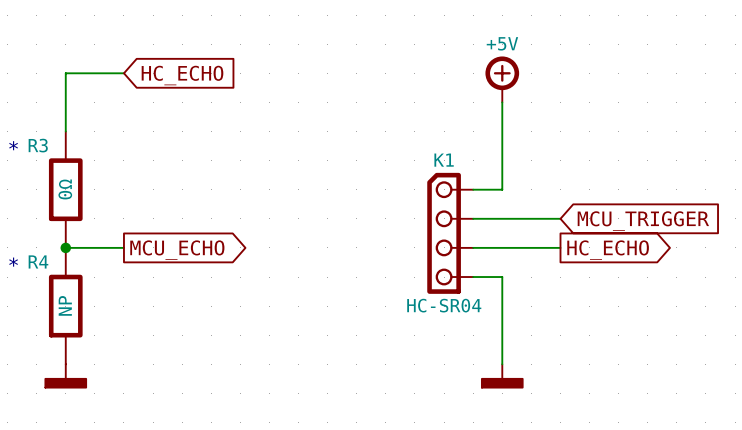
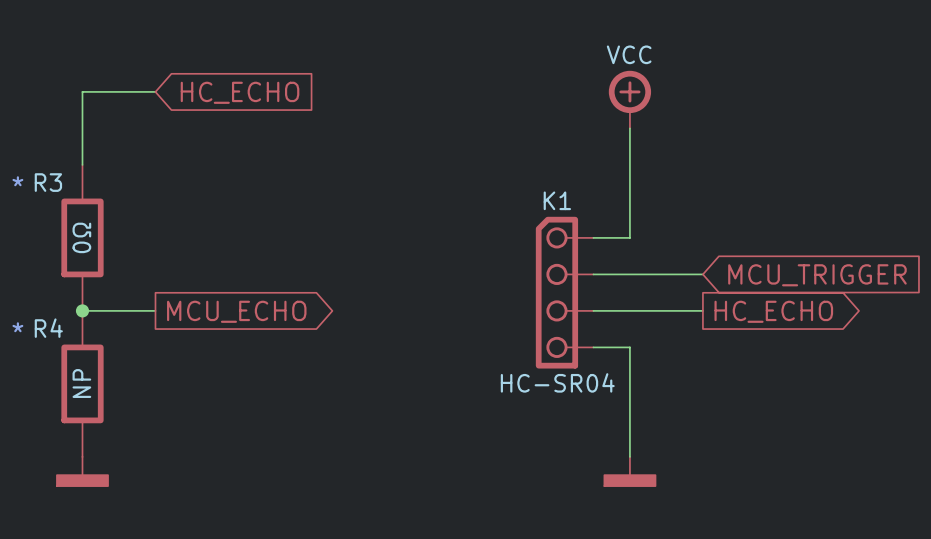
power symbol text: +5V (502, 43) -> VCC (629, 54)

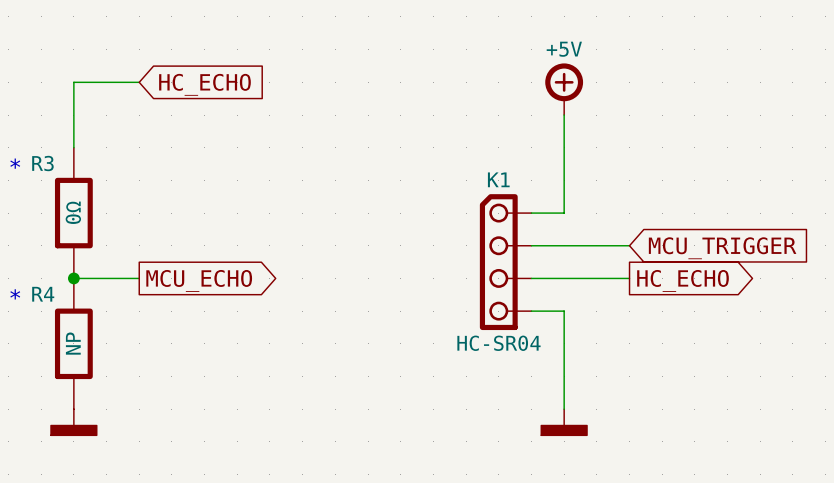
power symbol text: VCC (629, 54) -> +5V (564, 49)

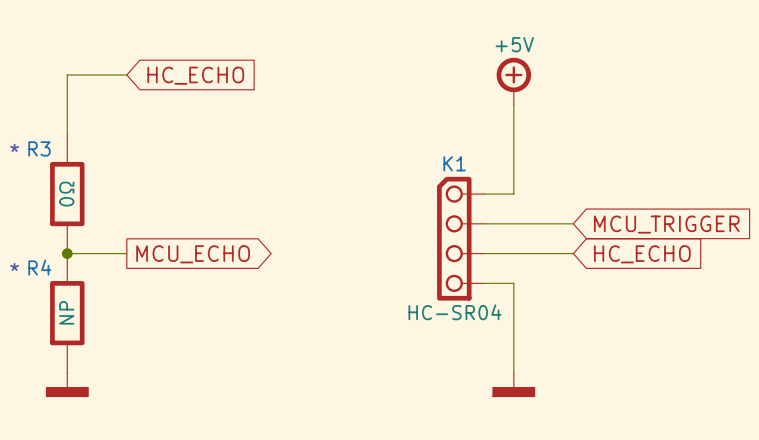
global label shape: output (683, 280) -> input (642, 254)

